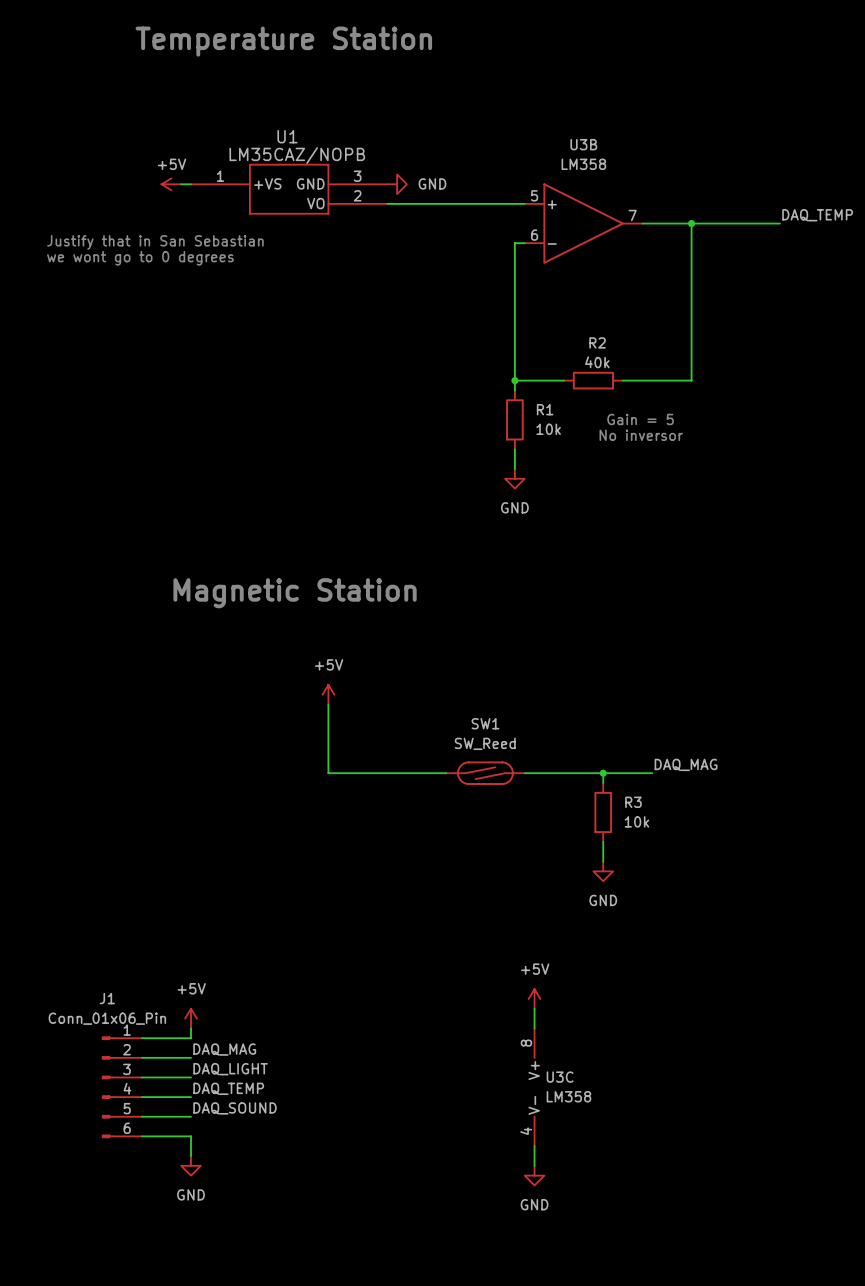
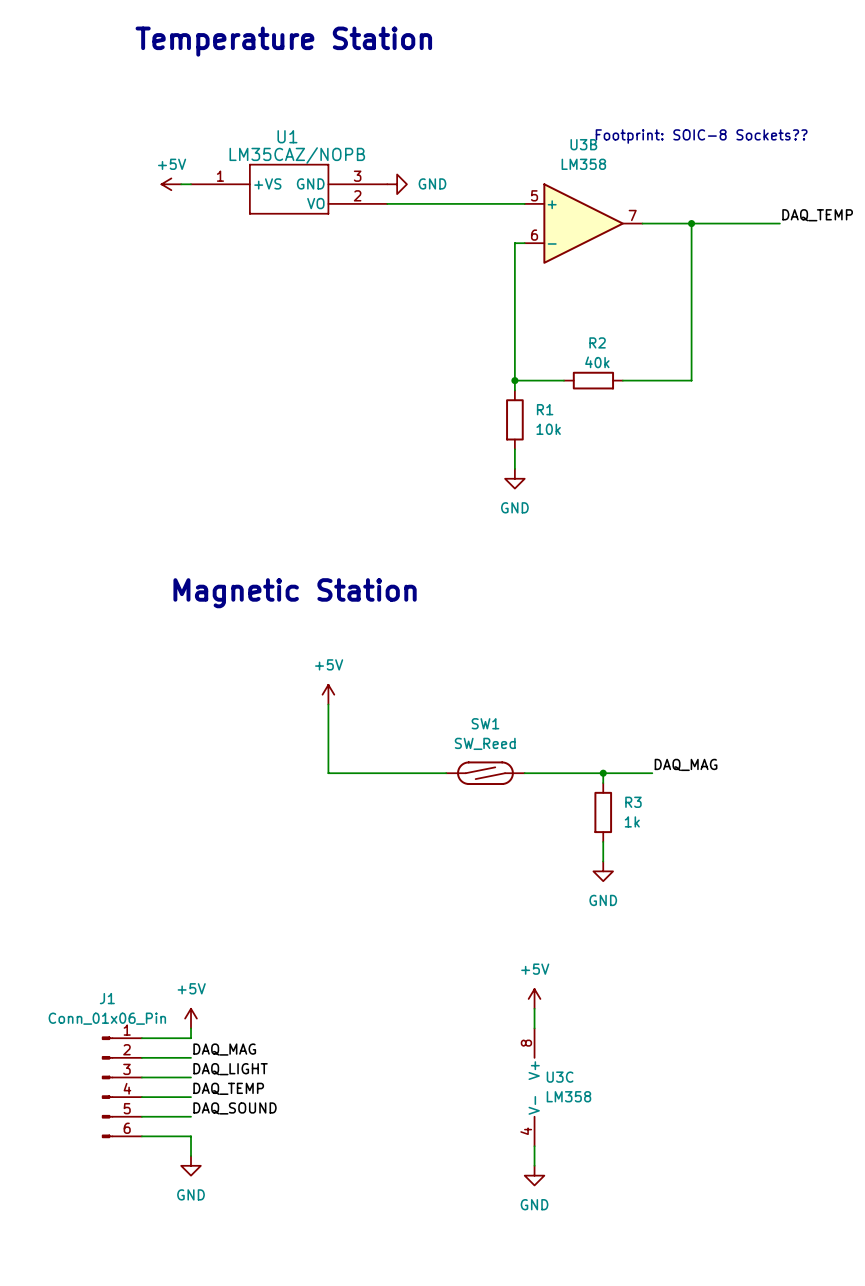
text: none -> Footprint: SOIC-8 Sockets?? (701, 136)
text: Justify that in San Sebastian (155, 242) -> none
text: we wont go to 0 degrees (140, 258) -> none
text: Gain = 5 (640, 419) -> none
text: No inversor (641, 435) -> none
R3 value: 10k (636, 821) -> 1k (632, 821)

